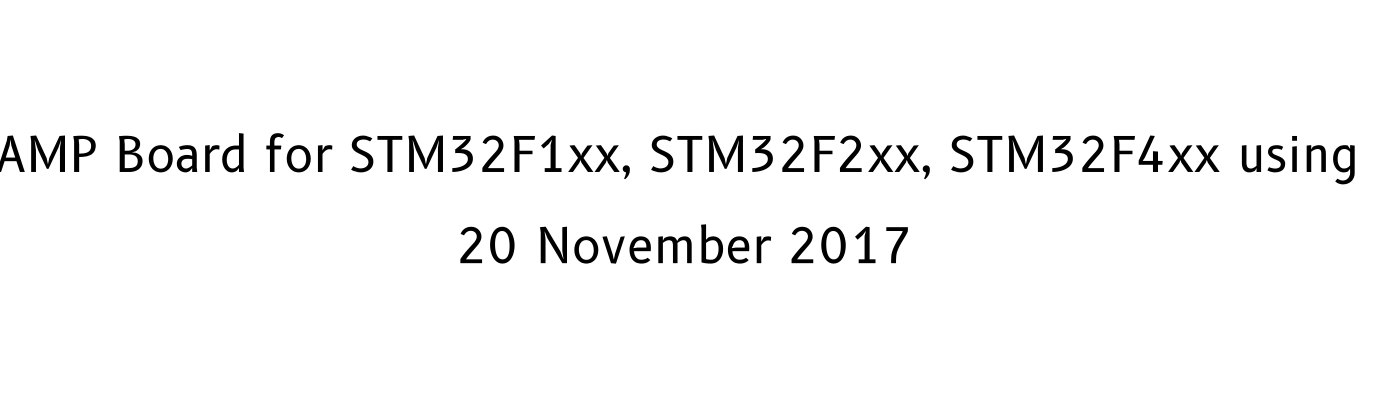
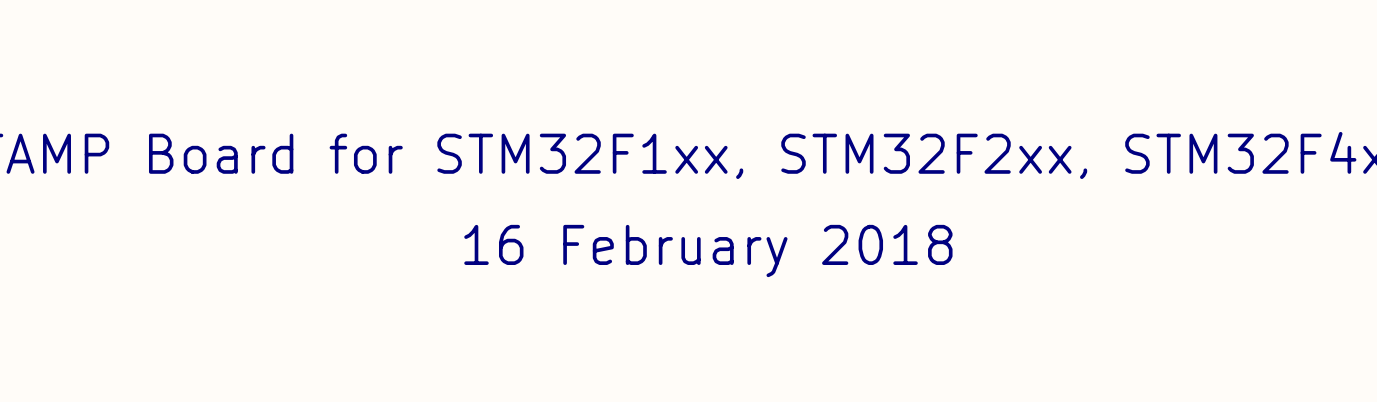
text: 20 November 2017 (684, 243) -> 16 February 2018 (708, 251)

